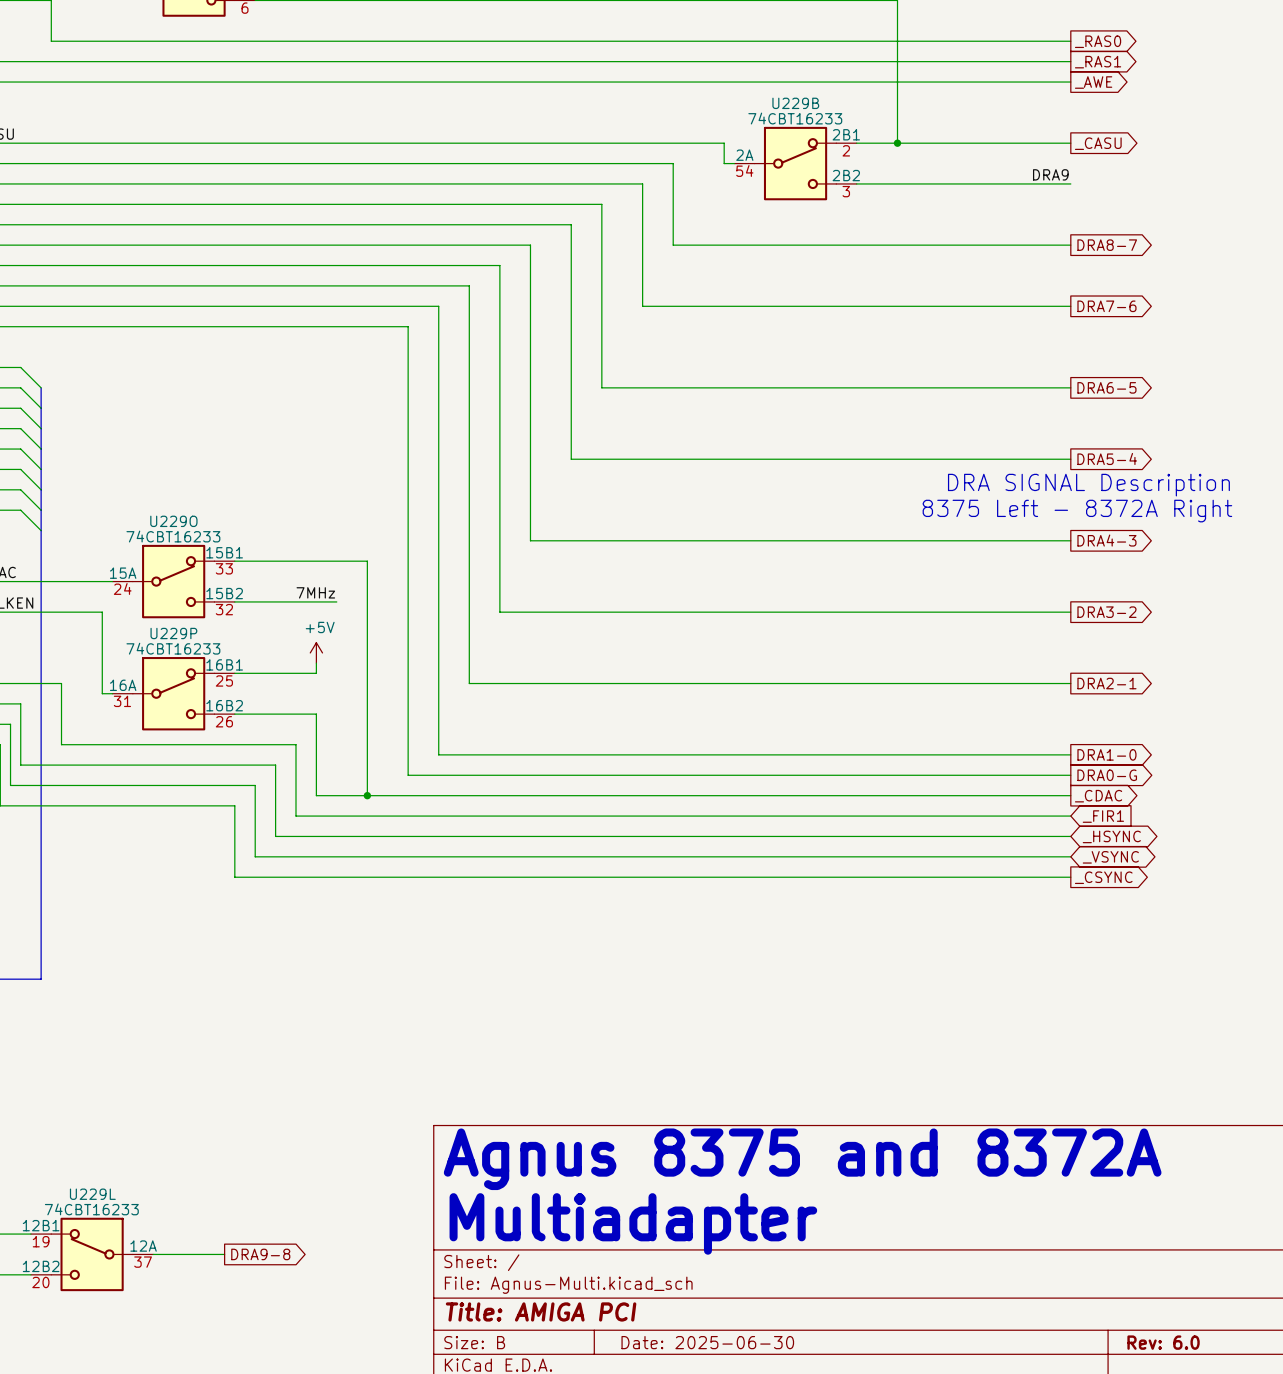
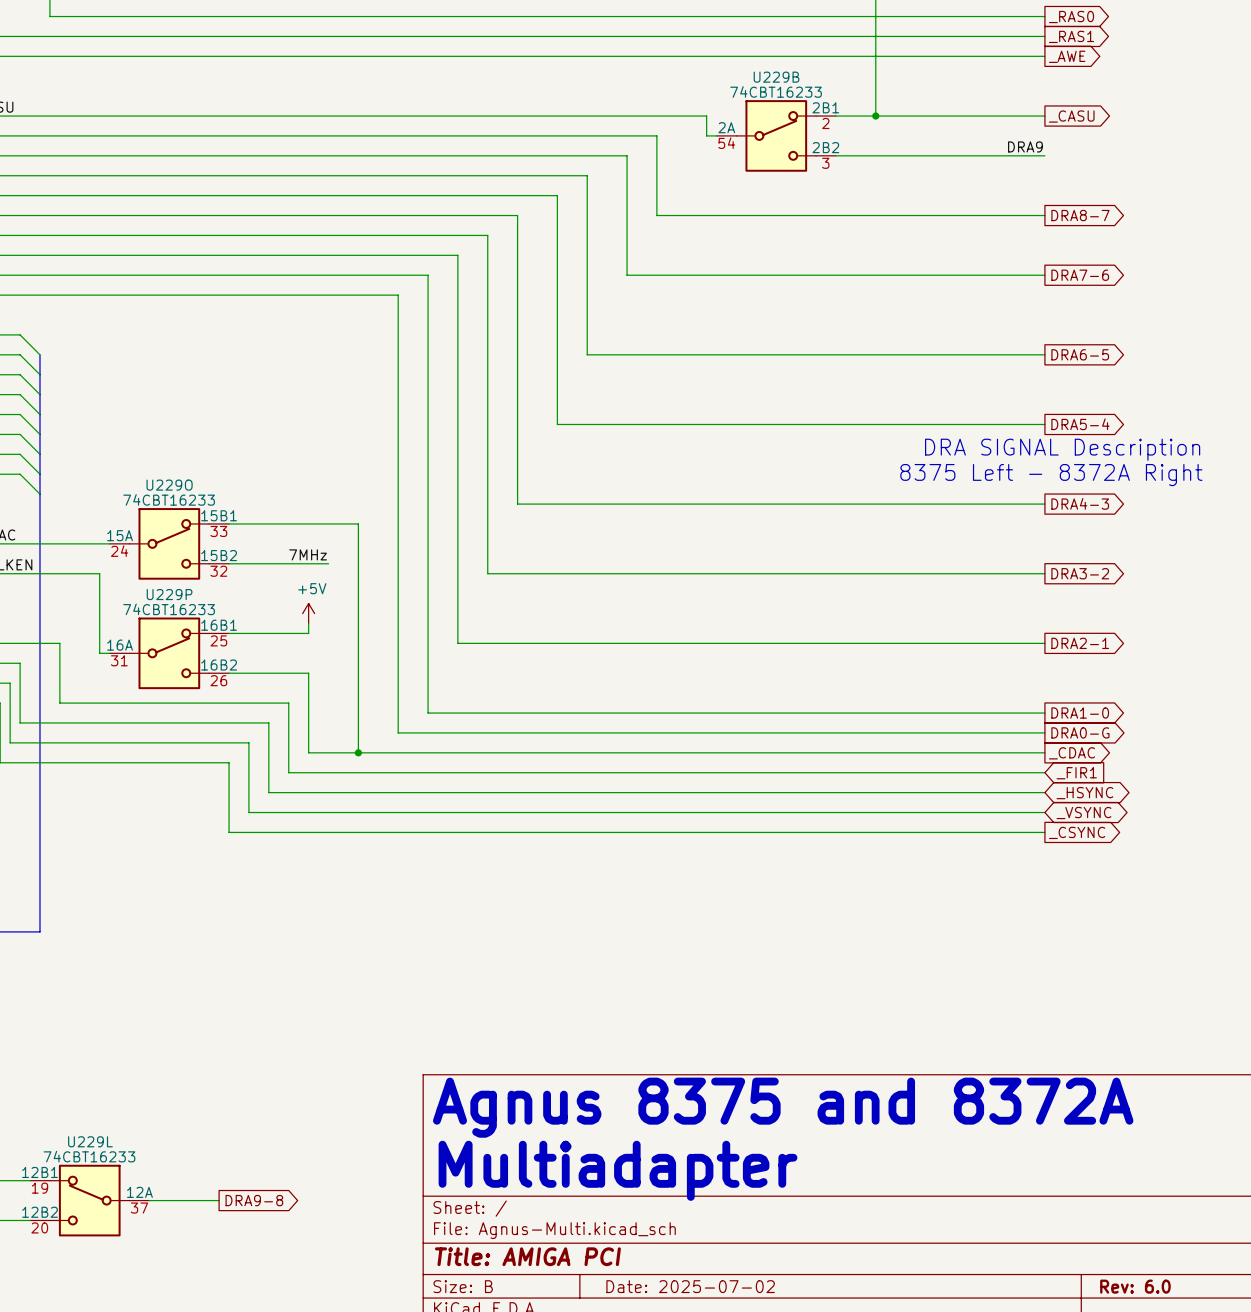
title block: Date: 2025-06-30 (707, 1342) -> Date: 2025-07-02 (690, 1286)

